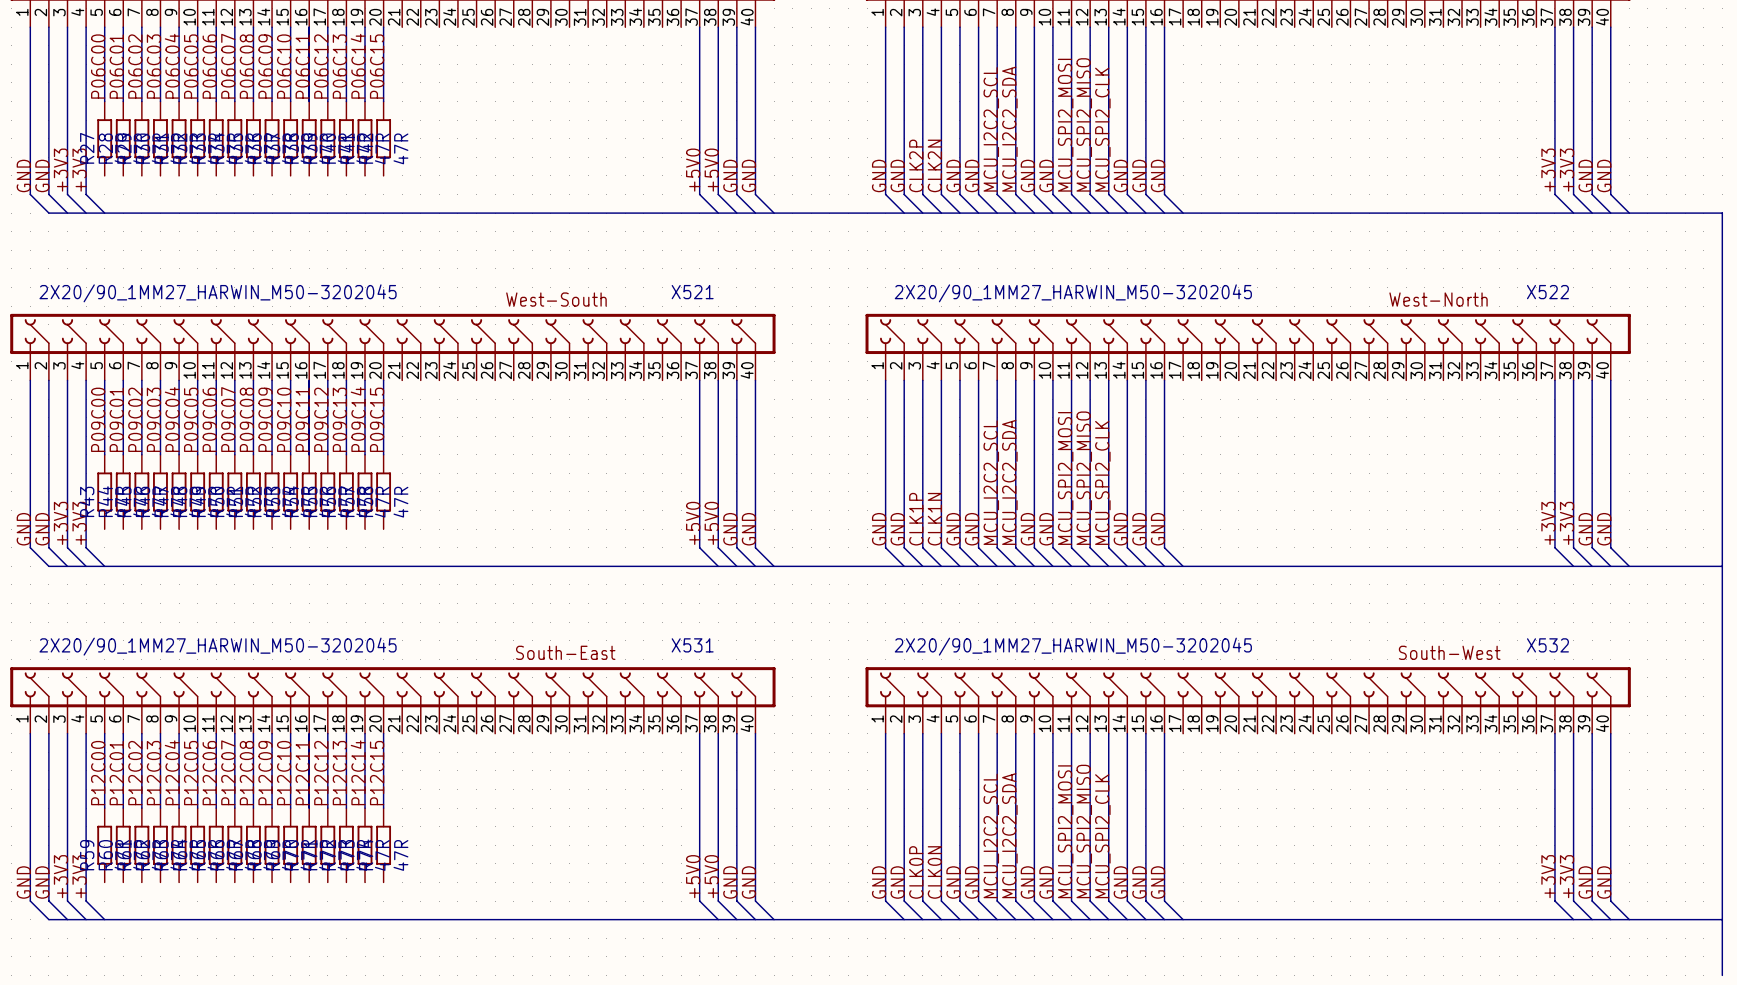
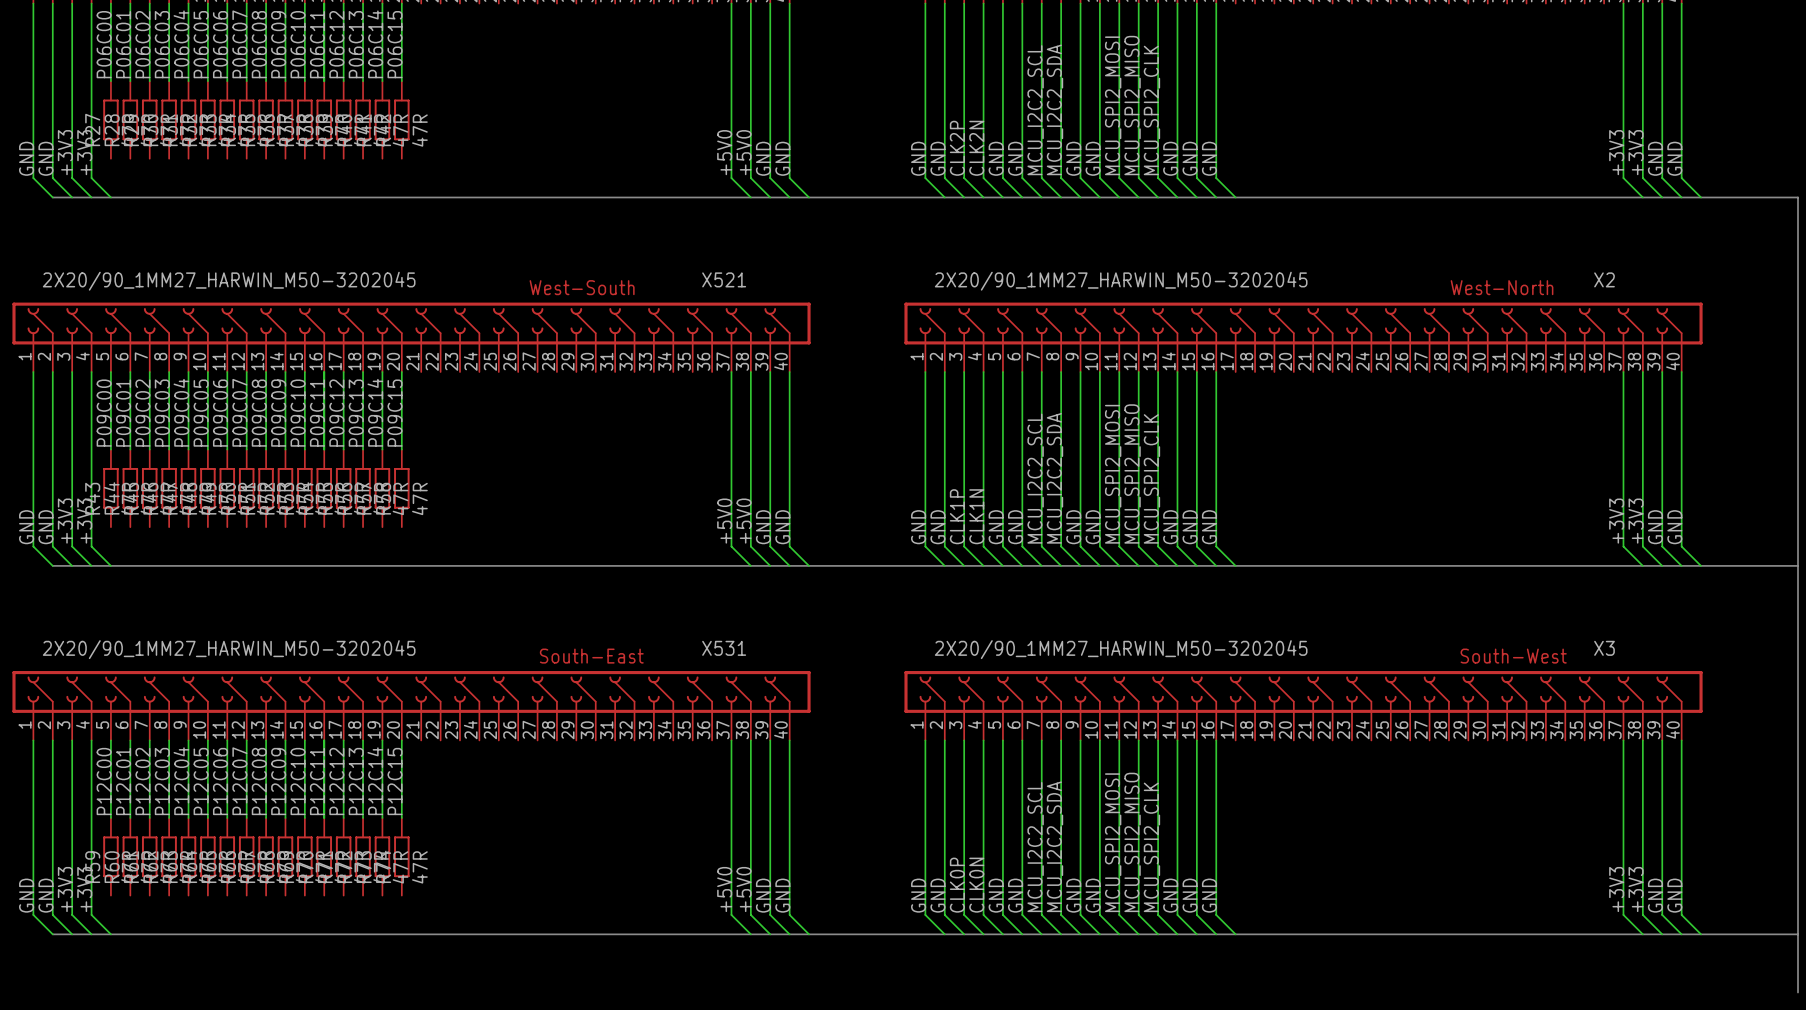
X522 name: X522 (1547, 292) -> X2 (1604, 279)
X532 name: X532 (1547, 645) -> X3 (1604, 648)

